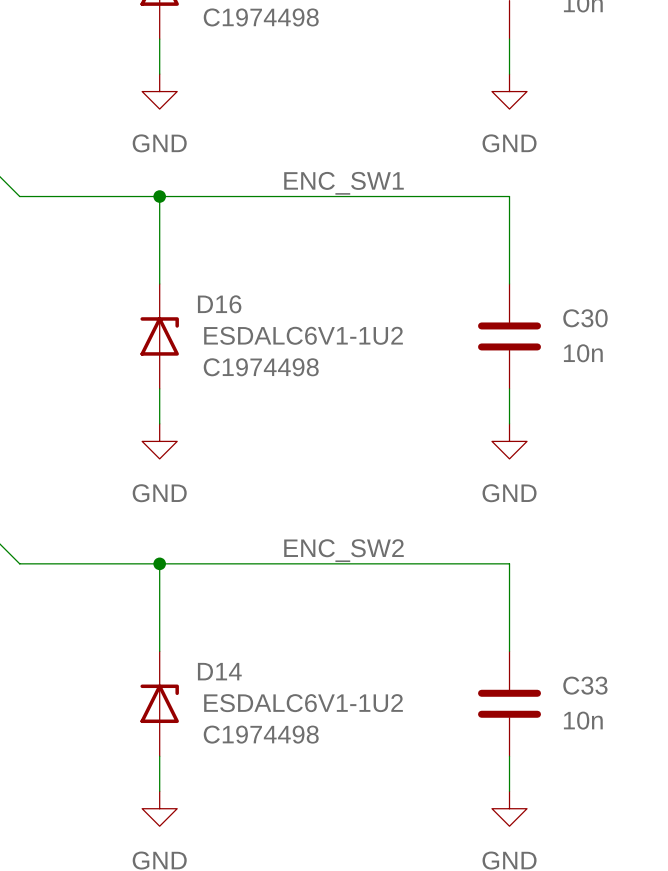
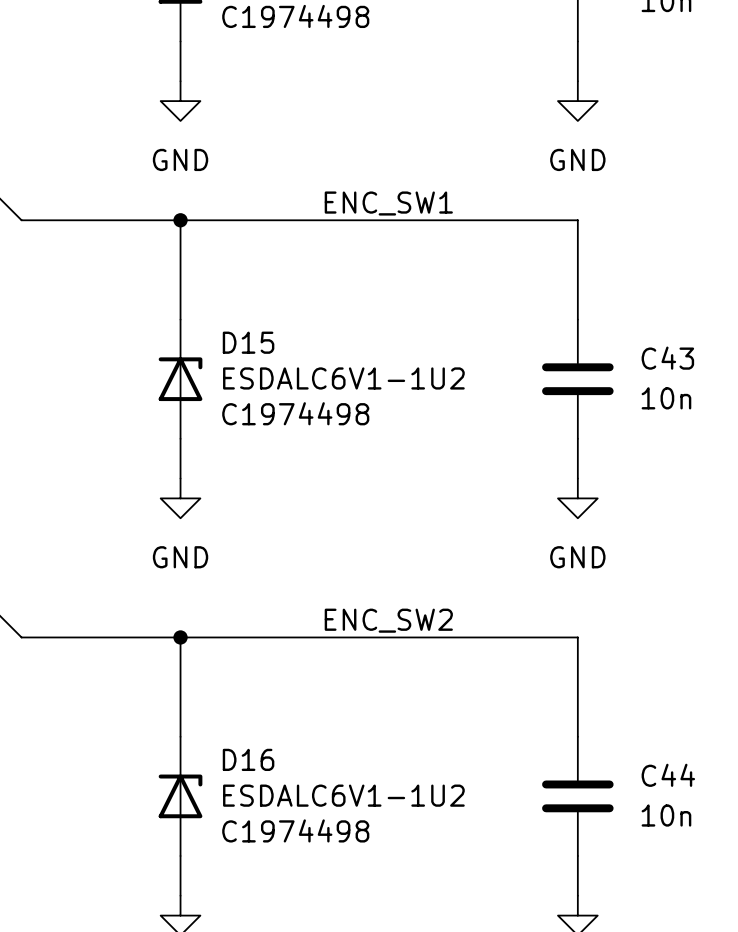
D16 name: D16 (219, 304) -> D15 (248, 342)
C30 name: C30 (585, 318) -> C43 (667, 358)
D14 name: D14 (219, 671) -> D16 (248, 759)
C33 name: C33 (585, 685) -> C44 (668, 775)

